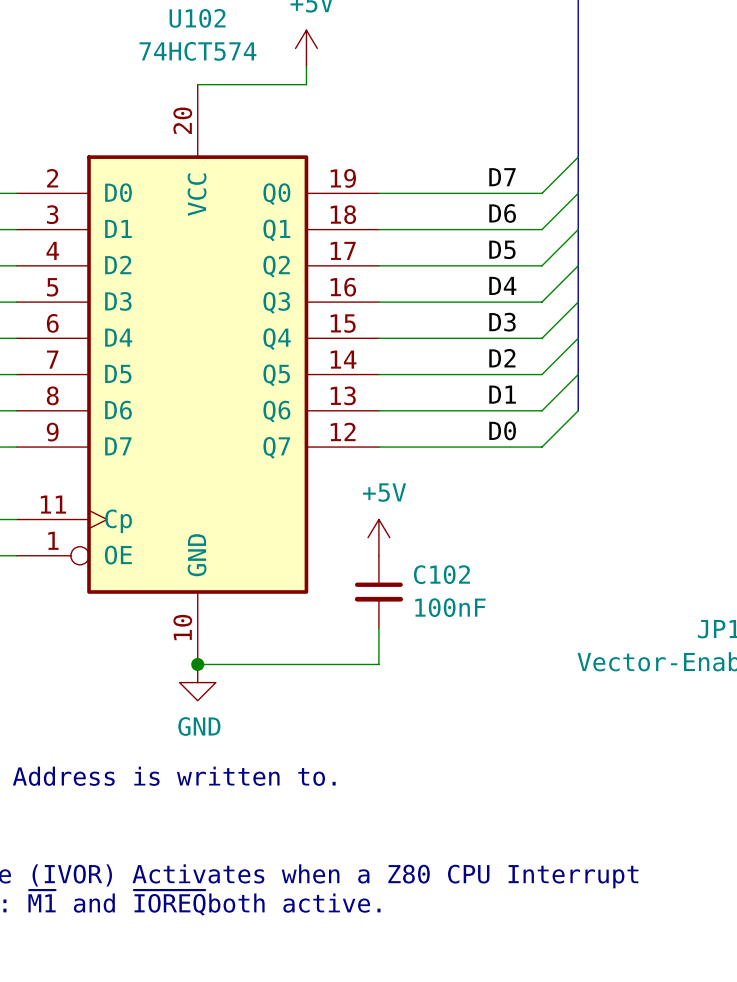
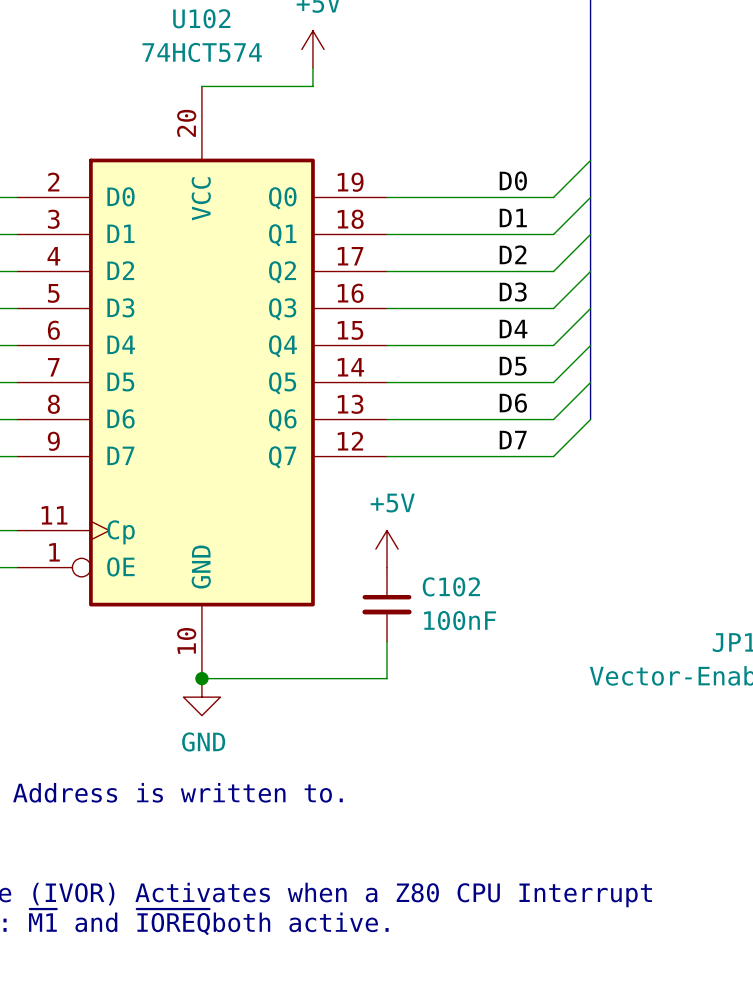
label: D7 (502, 177) -> D0 (513, 180)
label: D6 (502, 213) -> D1 (513, 217)
label: D5 (502, 249) -> D2 (513, 254)
label: D4 (502, 285) -> D3 (513, 292)
label: D3 (502, 322) -> D4 (513, 329)
label: D2 (502, 358) -> D5 (513, 366)
label: D1 (502, 394) -> D6 (513, 403)
label: D0 (502, 430) -> D7 (513, 440)

